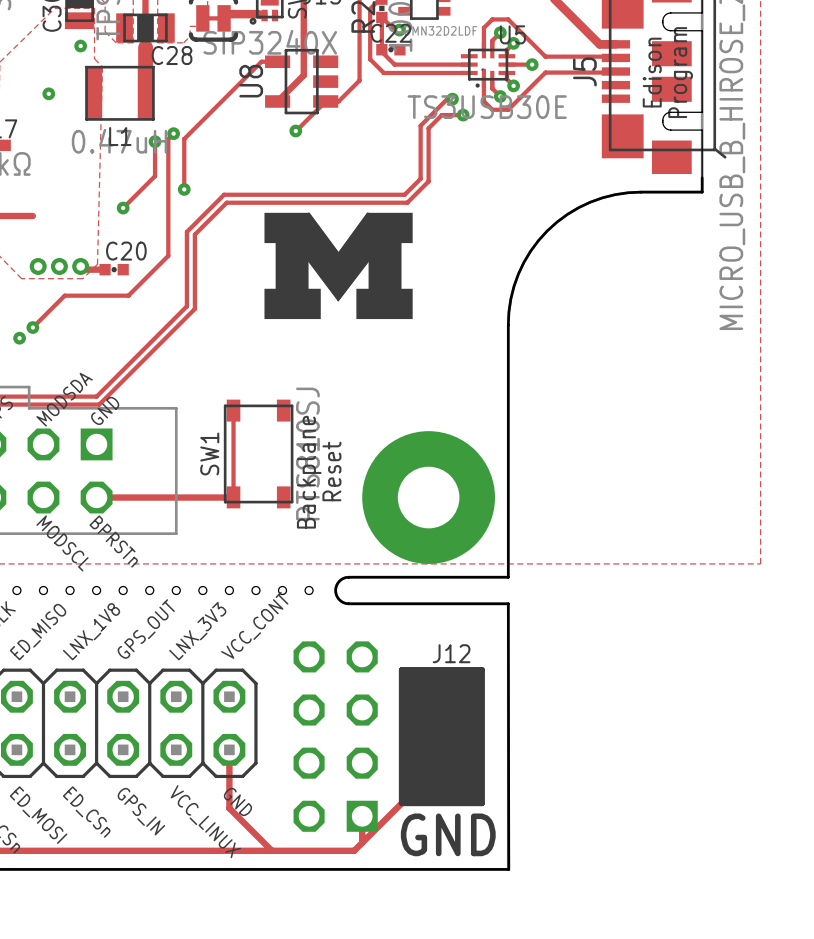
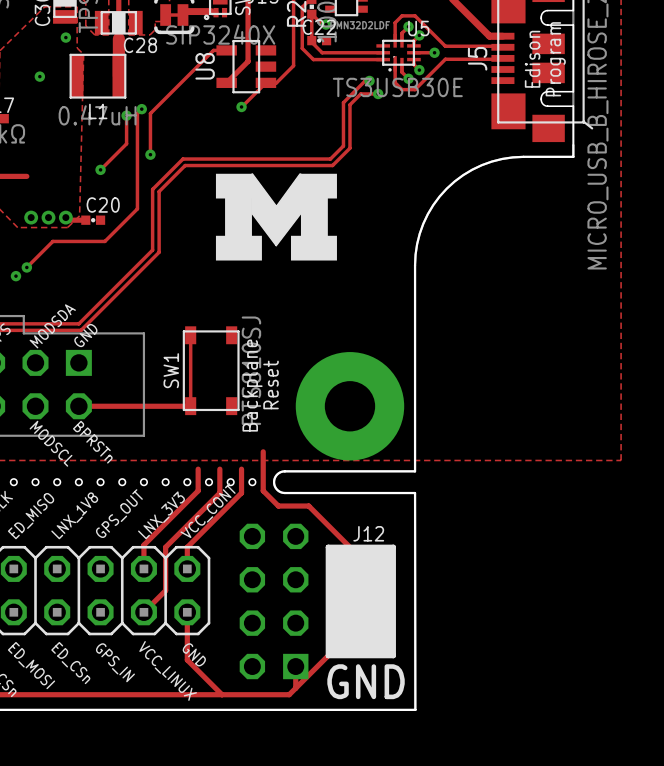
track: none -> (263, 451) (263, 490) (278, 506) (308, 506) (360, 558) (360, 579)
track: none -> (198, 469) (198, 490) (143, 545) (143, 568)
track: none -> (219, 469) (219, 493) (165, 547) (165, 590) (143, 612)
track: none -> (241, 469) (241, 493) (187, 547) (187, 568)

